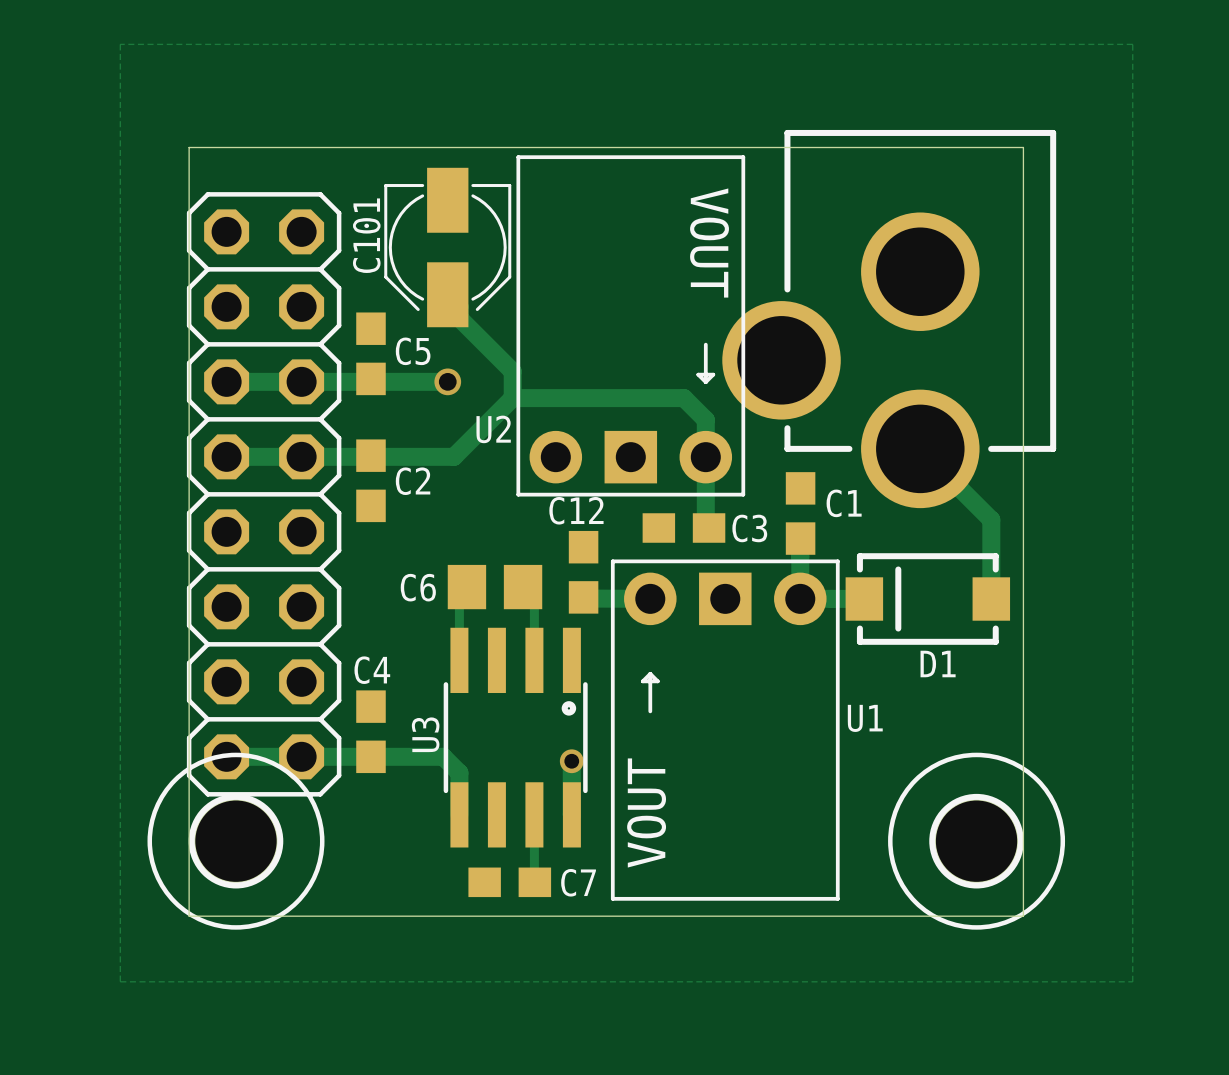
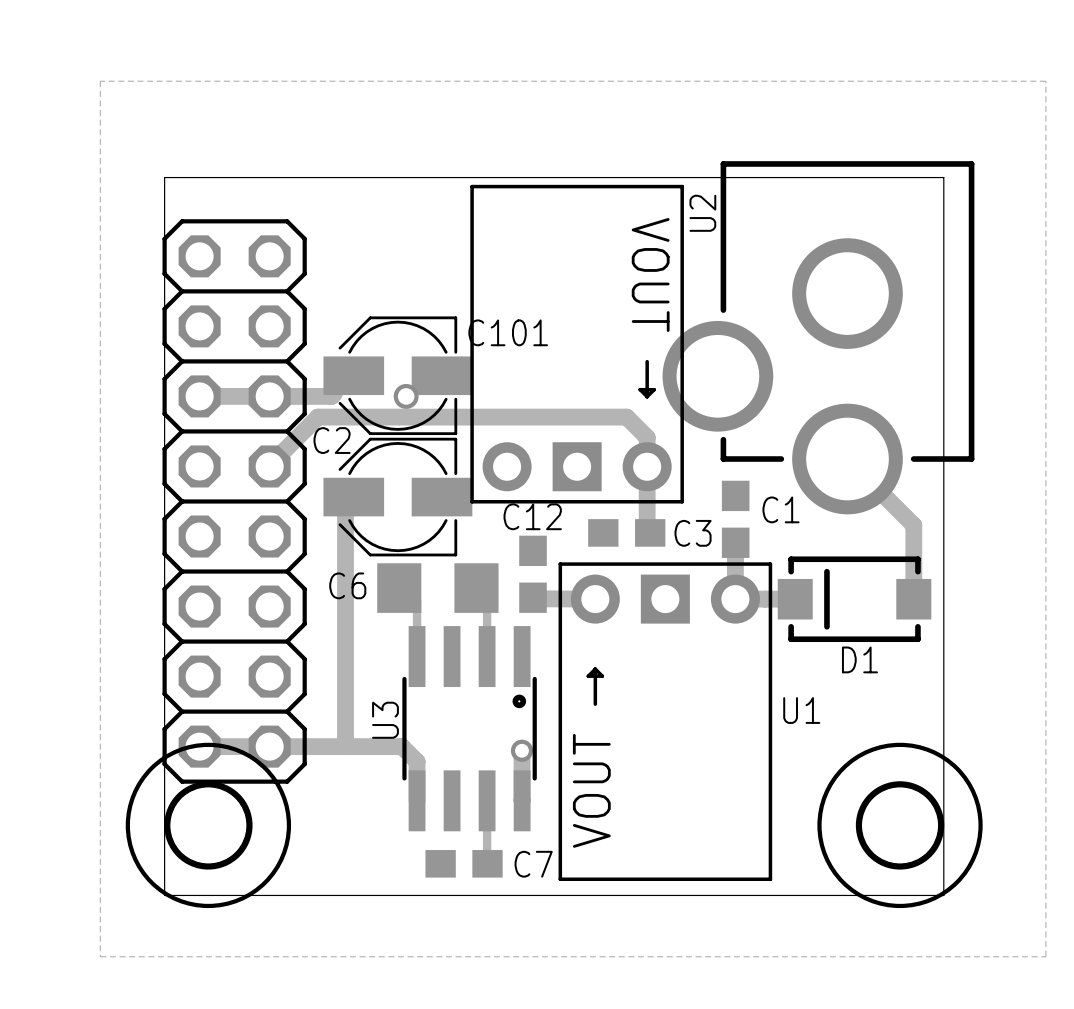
C101 name position: C101 (366, 235) -> C101 (508, 332)
C101 rotation: 0° (447, 247) -> 90° clockwise (397, 375)
C101 position: (447, 247) -> (397, 375)
track: (447, 294) (459, 306) (459, 318) (512, 371) (512, 398) -> none
C5: (370, 353) -> none
track: (447, 381) (370, 383) -> none
track: (512, 398) (683, 398) (705, 419) (705, 425) -> (269, 466) (317, 417) (626, 417) (647, 437)
track: (512, 398) (453, 456) (226, 456) -> none
U2 name rotation: 0° (493, 429) -> 90° counterclockwise (702, 213)
U2 name position: U2 (493, 429) -> U2 (702, 213)
C2 footprint: [356, 439, 386, 523] -> [323, 437, 473, 557]
C2 name position: C2 (413, 481) -> C2 (332, 440)
track: none -> (353, 497) (345, 505) (345, 746)
C6 footprint: [447, 564, 543, 610] -> [377, 563, 499, 613]
C4: (370, 731) -> none

